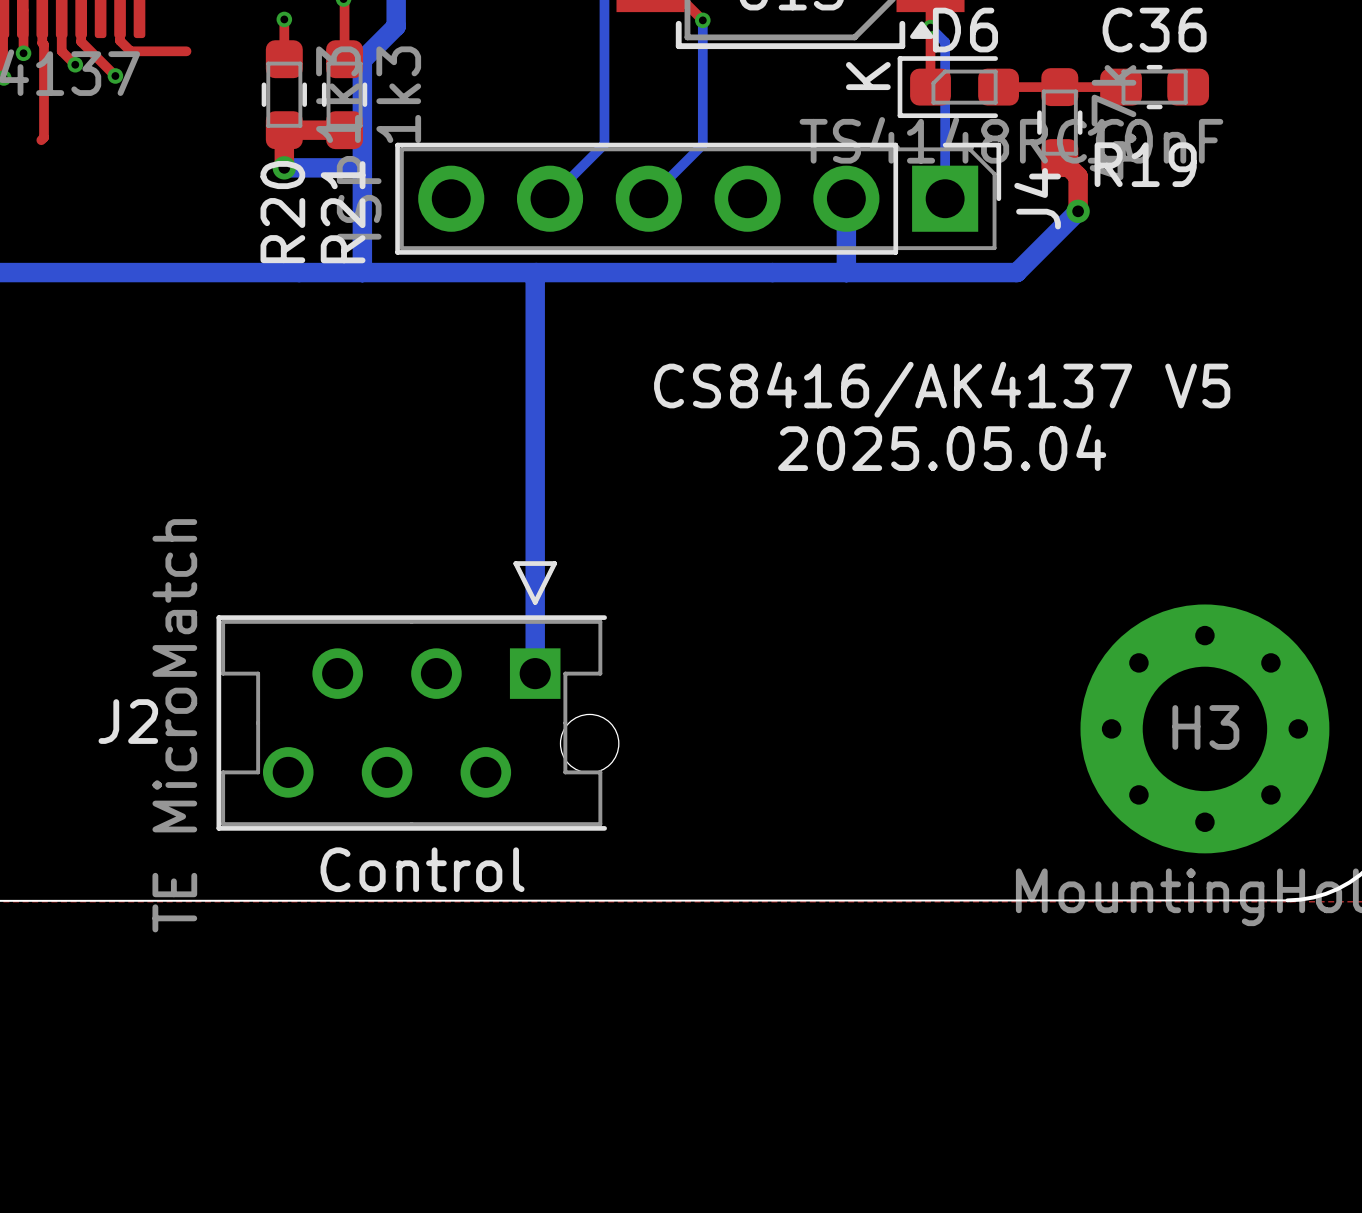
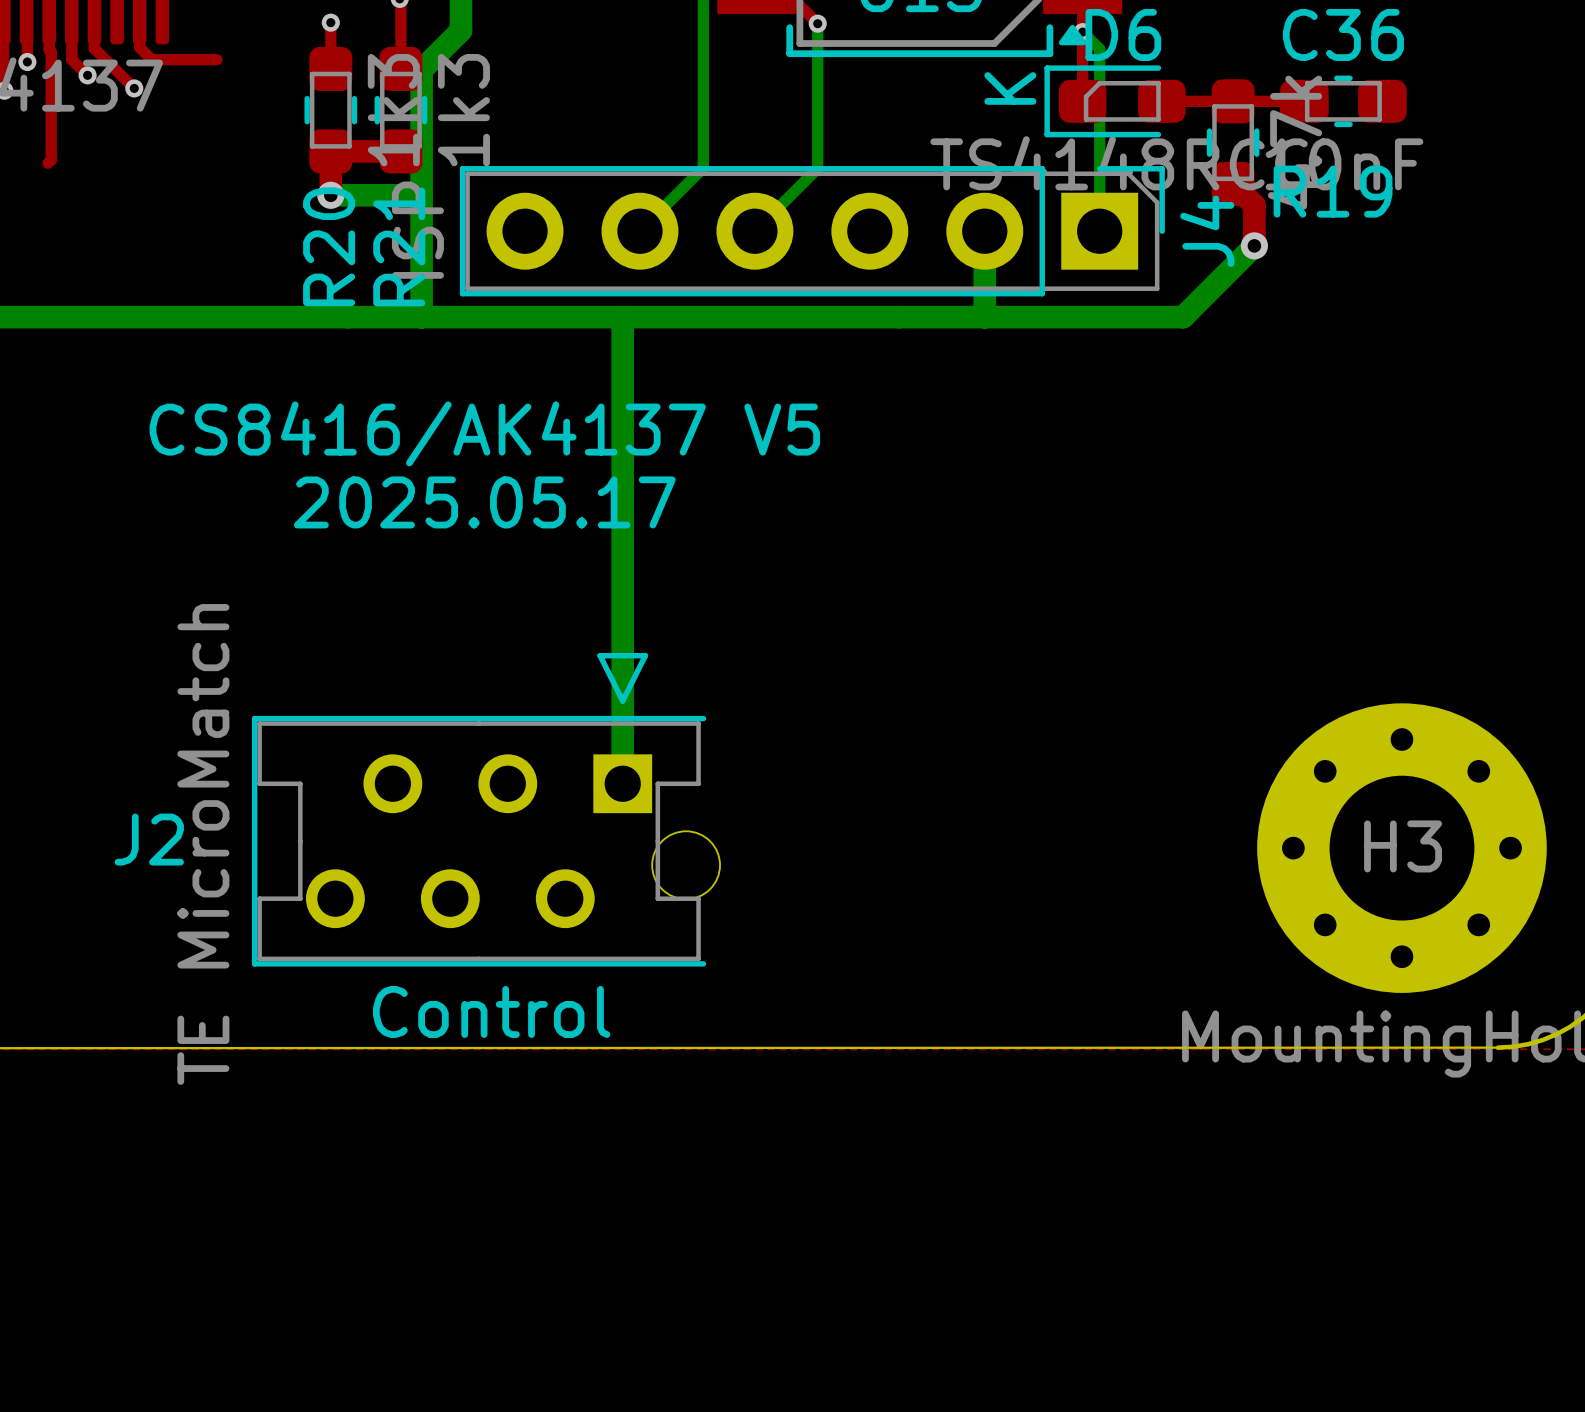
text position: CS8416/AK4137 V5 (942, 389) -> CS8416/AK4137 V5 (484, 433)
text: none -> 2025.05.17 (484, 502)
text: 2025.05.04 (942, 447) -> none

